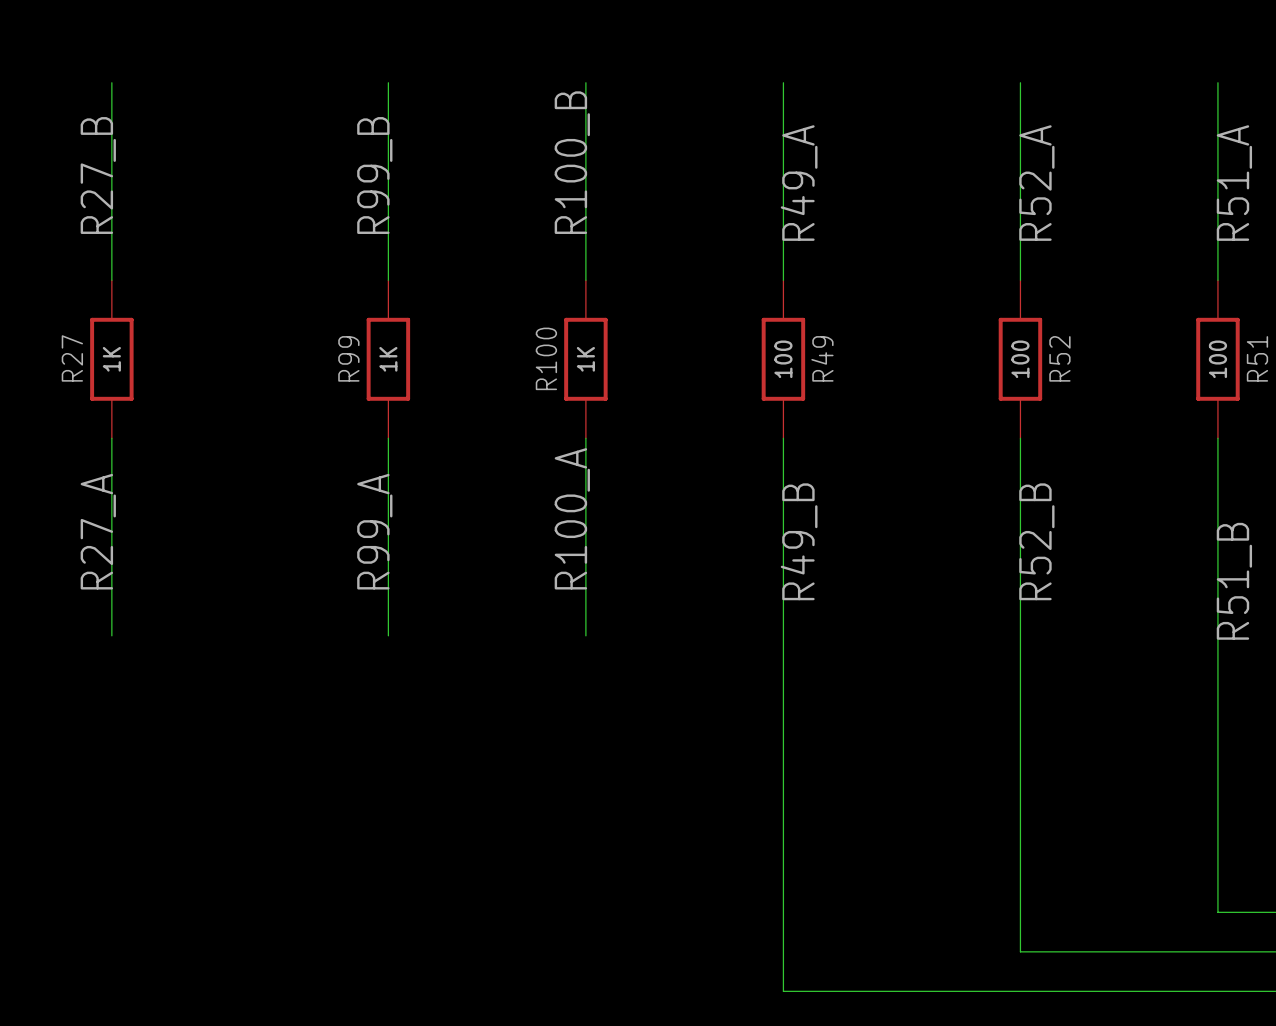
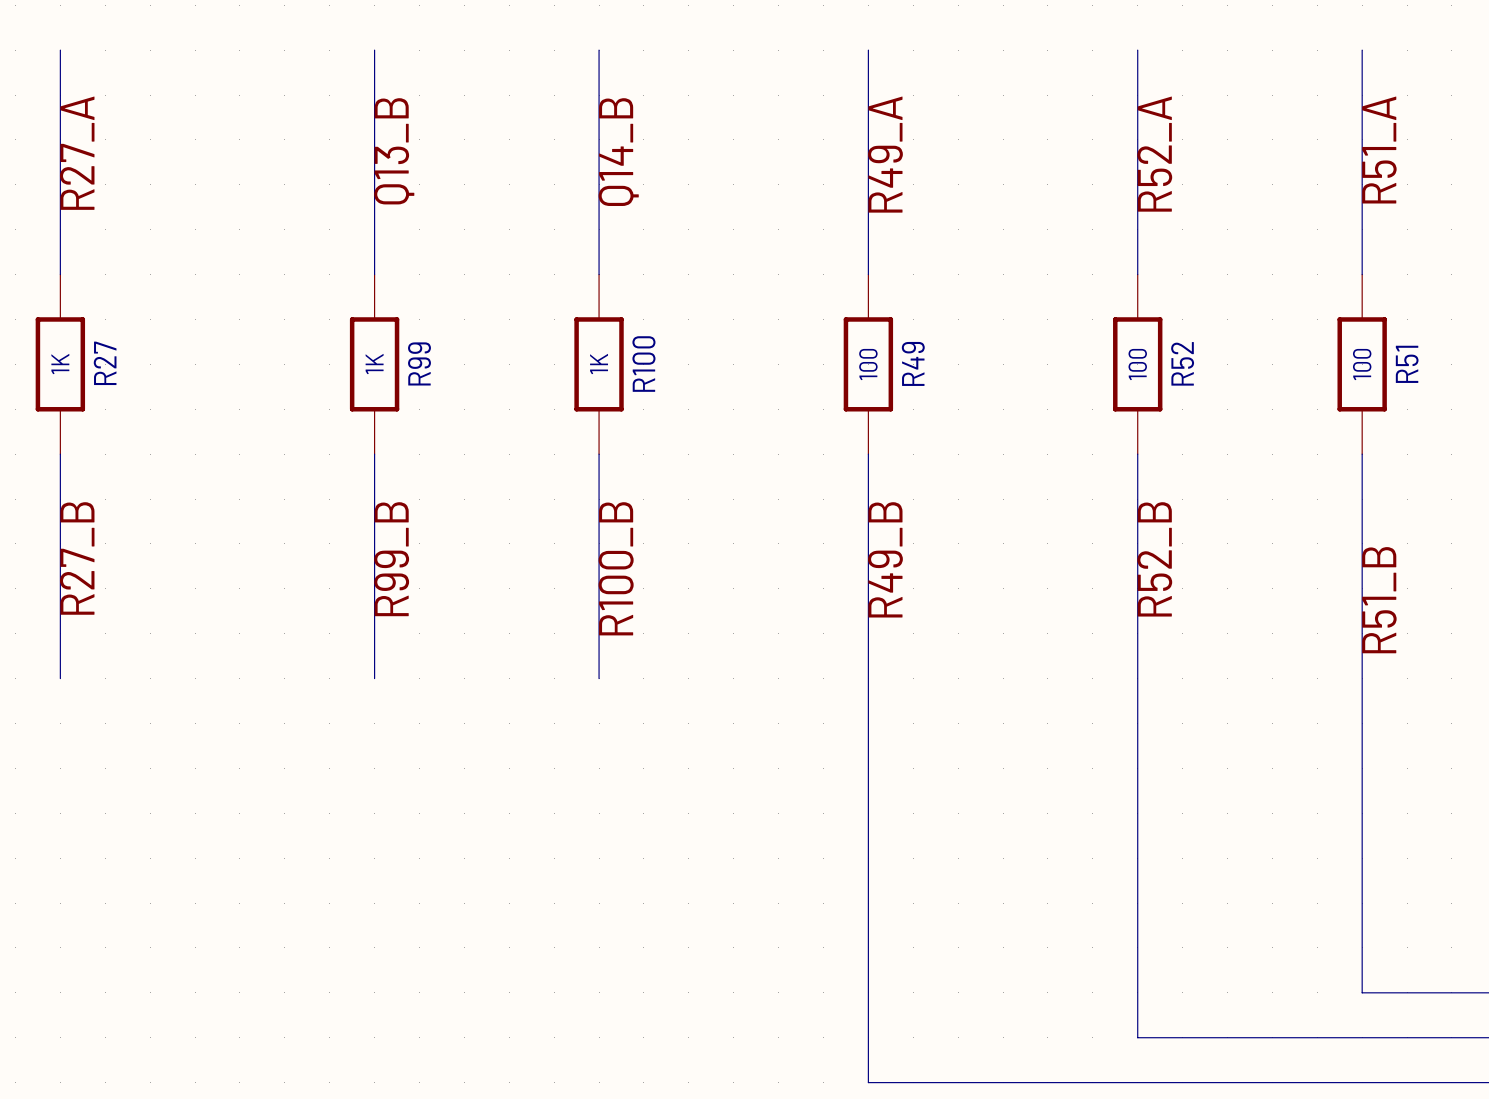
wire: (111, 82) (111, 280) -> (60, 50) (60, 274)
wire: (388, 82) (388, 280) -> (374, 50) (374, 274)
wire: (585, 82) (585, 280) -> (599, 50) (599, 274)
label position: R100_B (572, 162) -> R100_B (616, 568)
label position: R27_B (98, 175) -> R27_B (77, 558)
label position: R99_B (374, 175) -> R99_B (391, 559)
label: none -> R27_A (77, 153)
label: none -> Q13_B (394, 151)
label: none -> Q14_B (618, 152)
R27 name position: R27 (72, 358) -> R27 (105, 363)
R99 name position: R99 (348, 358) -> R99 (419, 363)
R100 name position: R100 (546, 358) -> R100 (643, 364)
R27 position: (111, 359) -> (60, 364)
R99 position: (388, 359) -> (374, 364)
R100 position: (585, 359) -> (599, 364)
wire: (111, 438) (111, 635) -> (60, 454) (60, 678)
wire: (388, 438) (388, 635) -> (374, 454) (374, 678)
wire: (585, 438) (585, 635) -> (599, 454) (599, 678)
label: R100_A (572, 518) -> none
label: R27_A (98, 531) -> none
label: R99_A (374, 531) -> none

